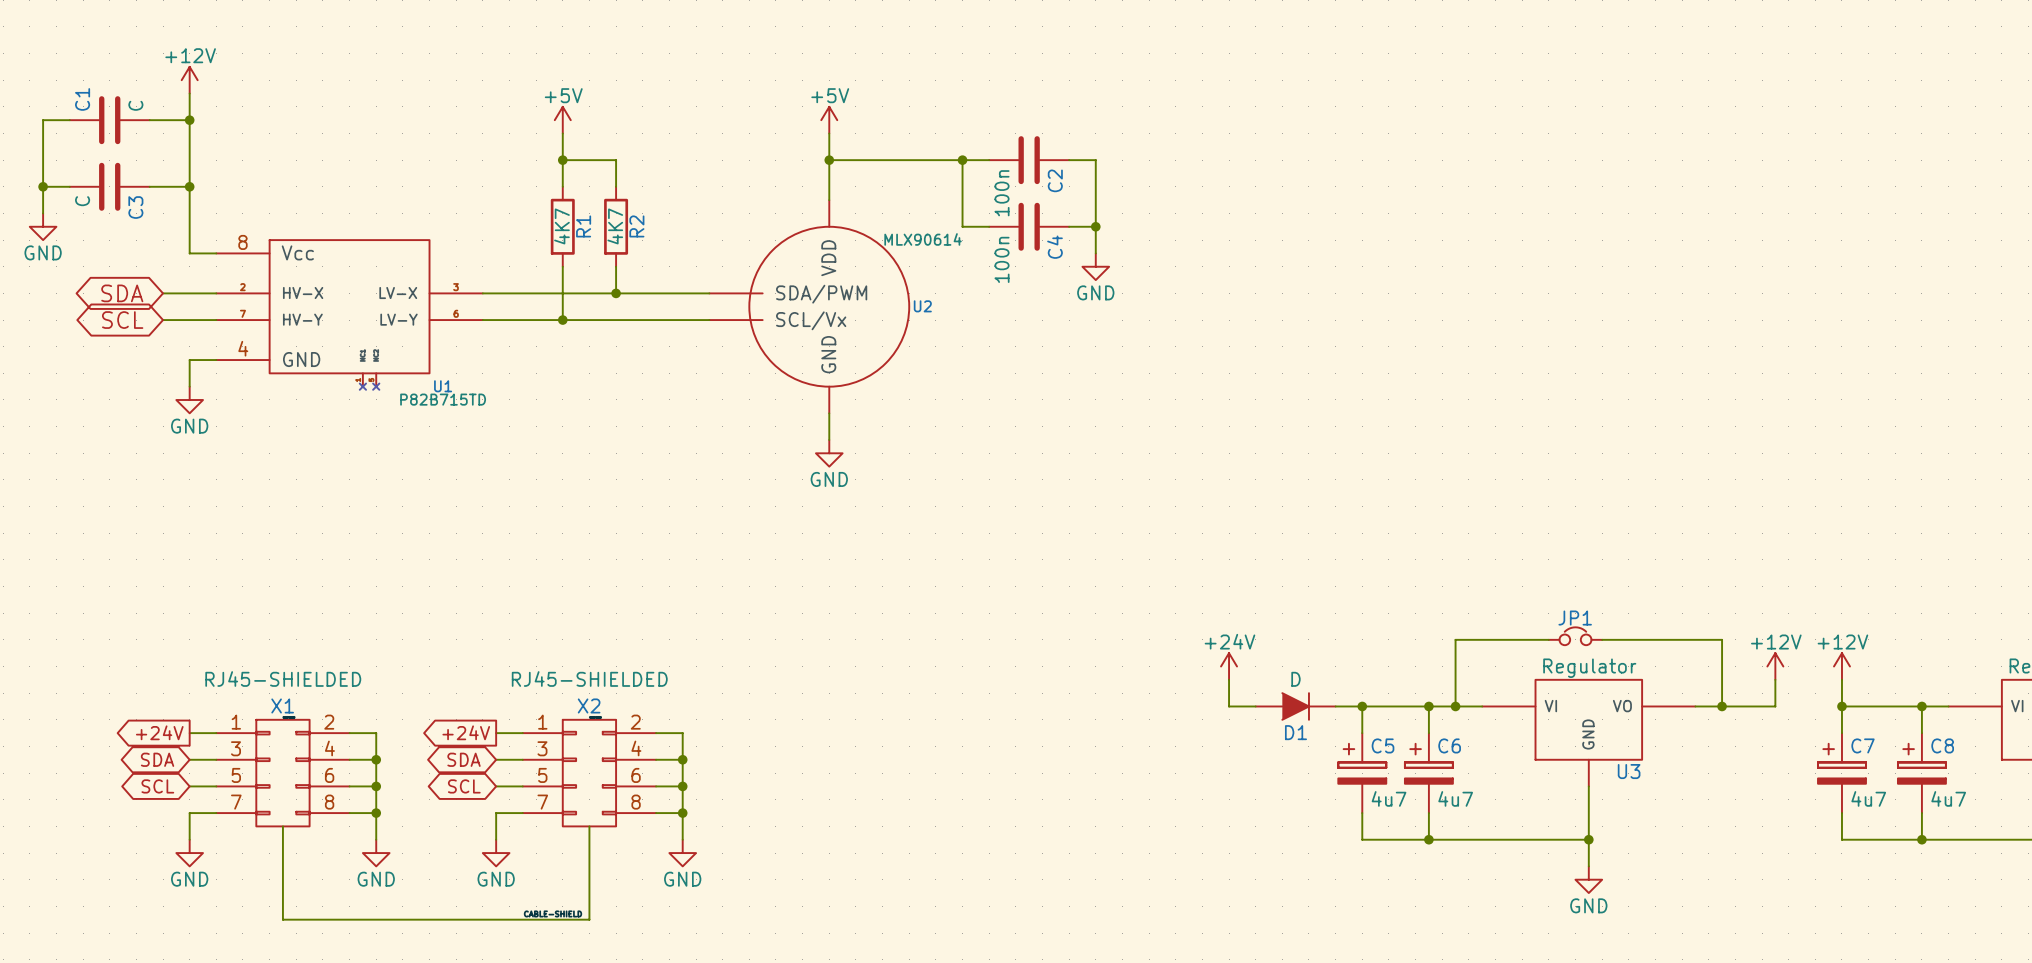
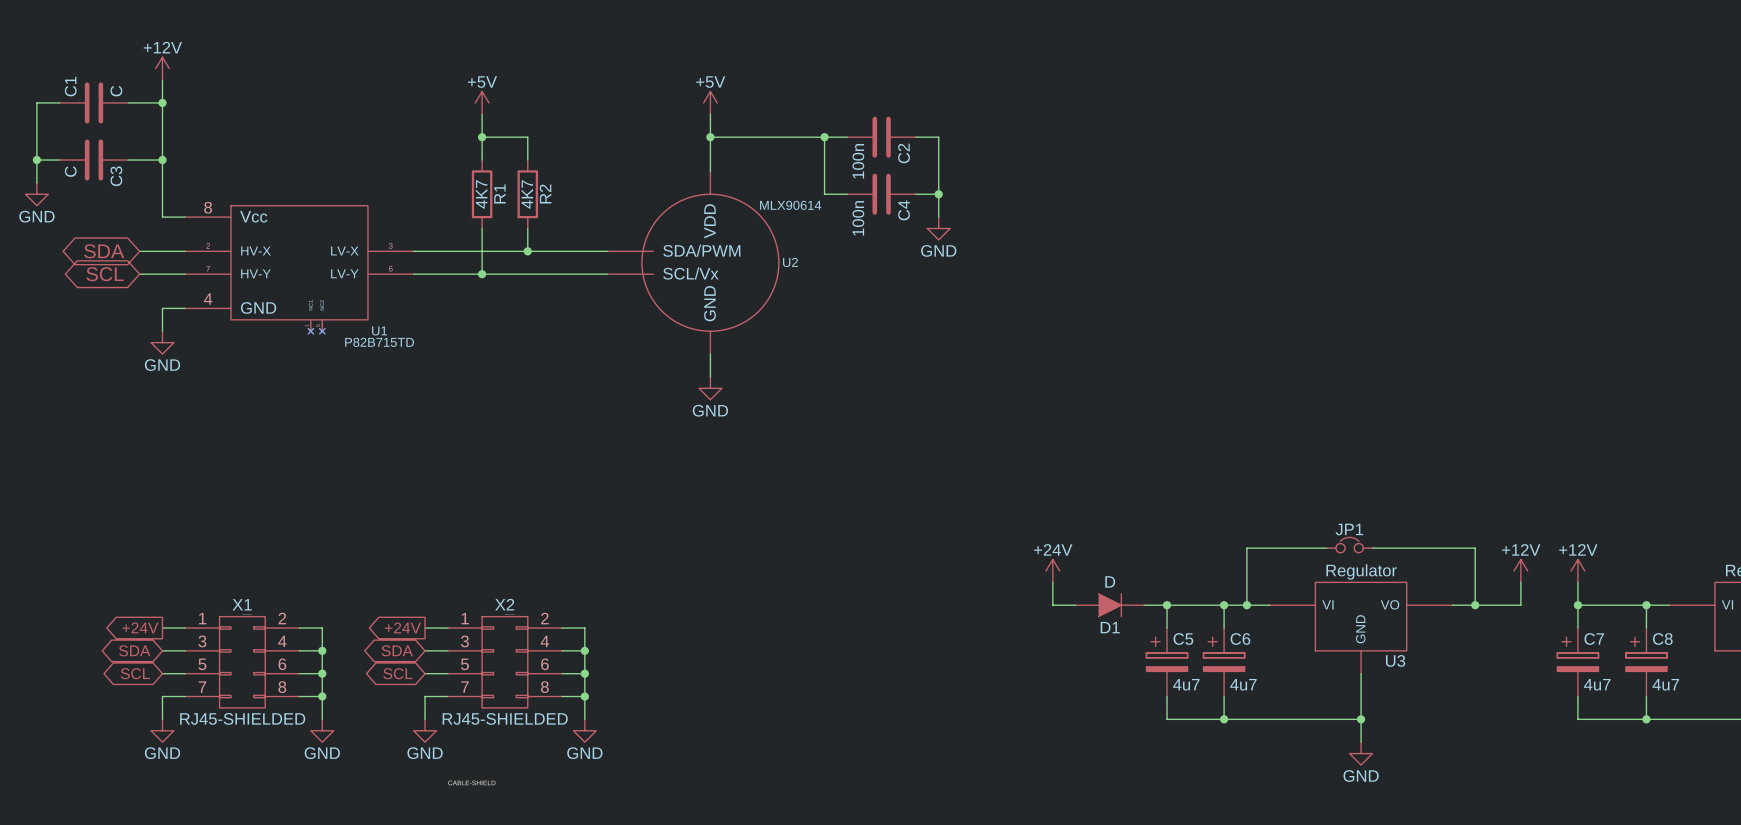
X1 value position: RJ45-SHIELDED (283, 679) -> RJ45-SHIELDED (242, 718)
X2 value position: RJ45-SHIELDED (589, 679) -> RJ45-SHIELDED (505, 718)
wire: (282, 826) (282, 919) (589, 919) (589, 826) -> none

